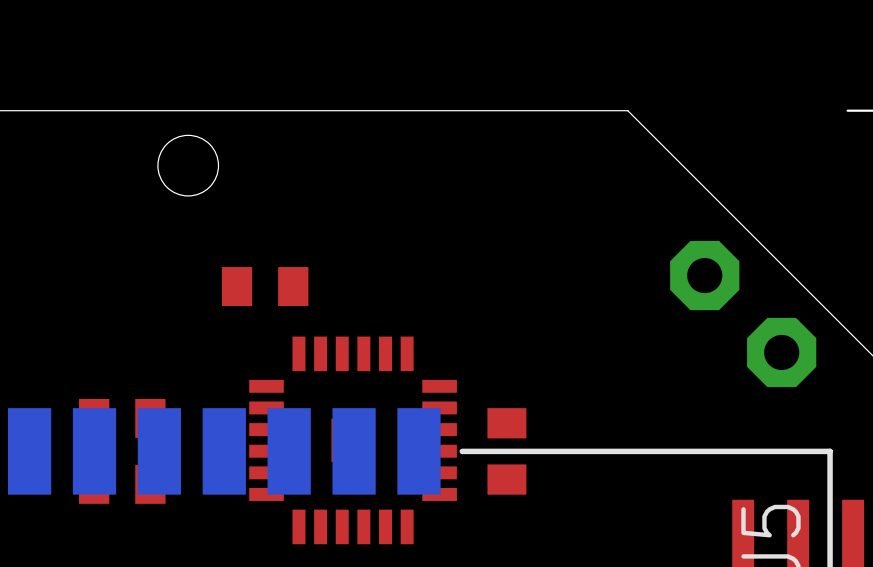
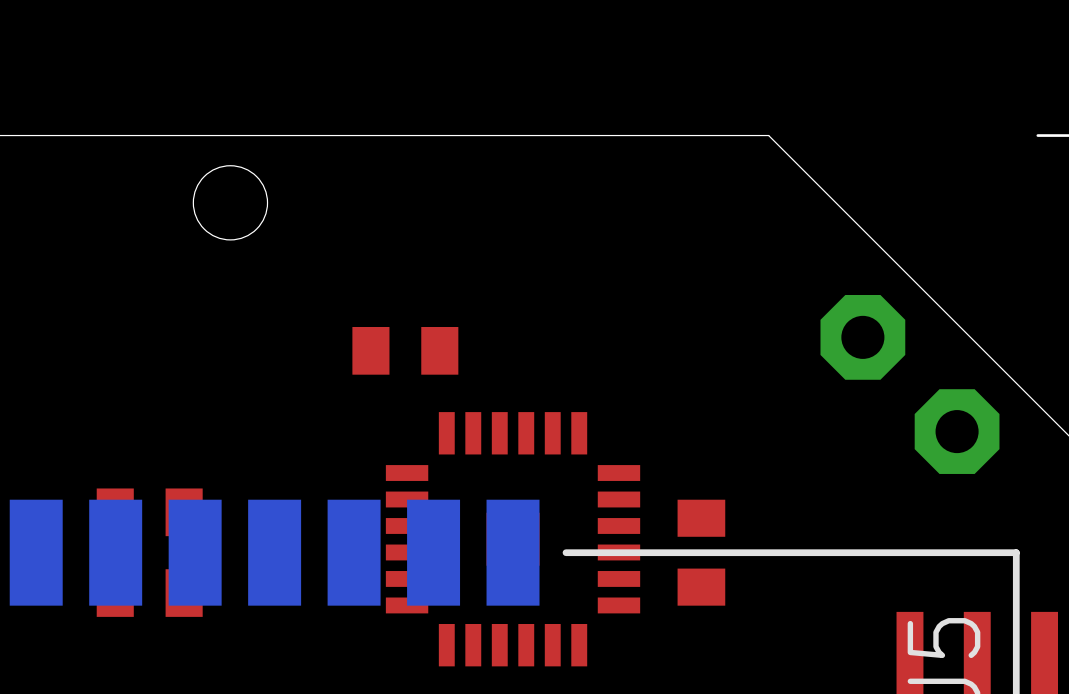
part position: (265, 286) -> (405, 350)
part position: (353, 440) -> (513, 539)
part position: (506, 451) -> (701, 552)

